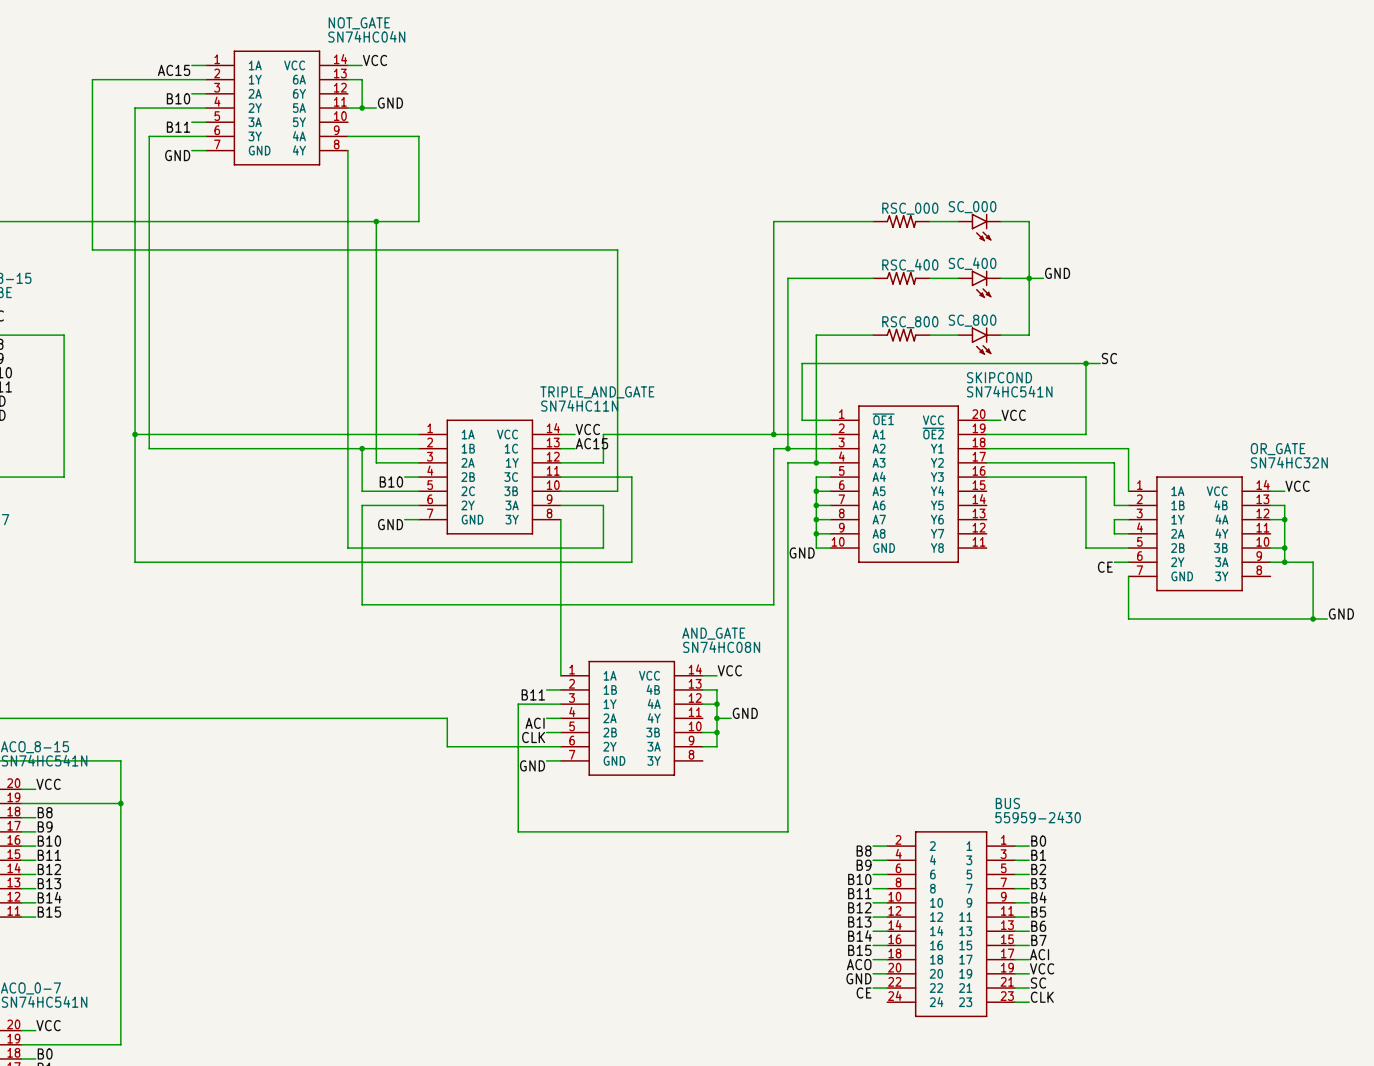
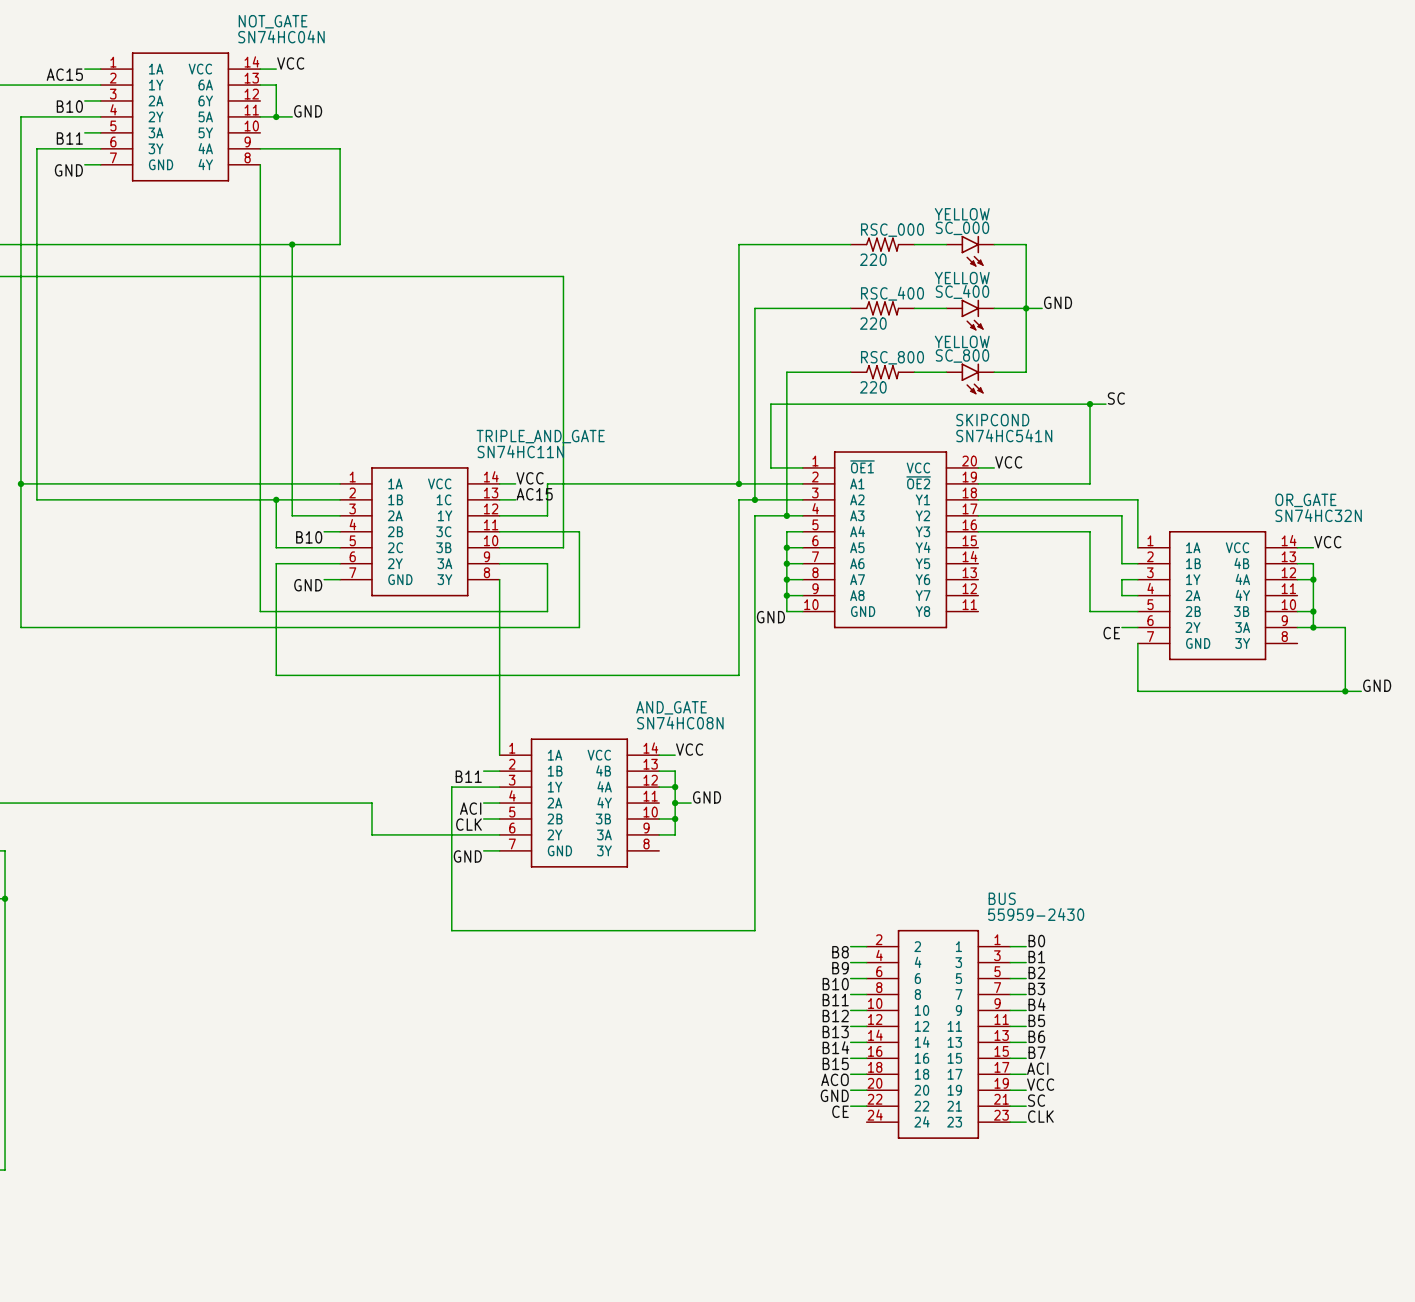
SC_000 value: none -> YELLOW (962, 214)
RSC_000 value: none -> 220 (873, 259)
SC_400 value: none -> YELLOW (962, 278)
RSC_400 value: none -> 220 (873, 323)
SC_800 value: none -> YELLOW (962, 341)
RSC_800 value: none -> 220 (873, 387)

